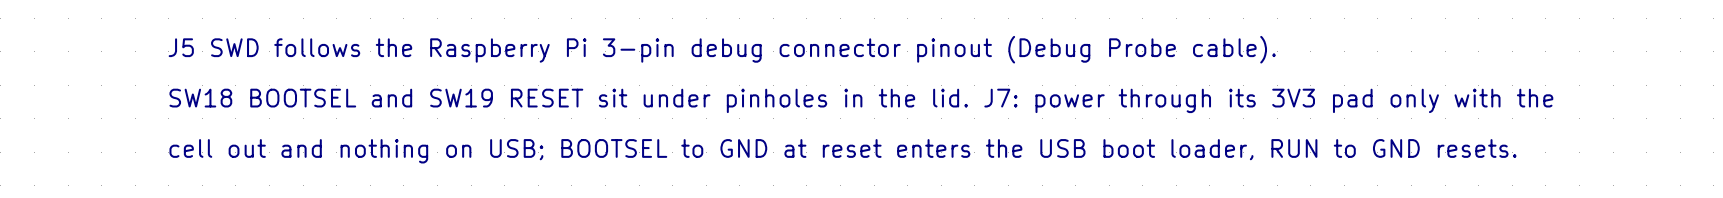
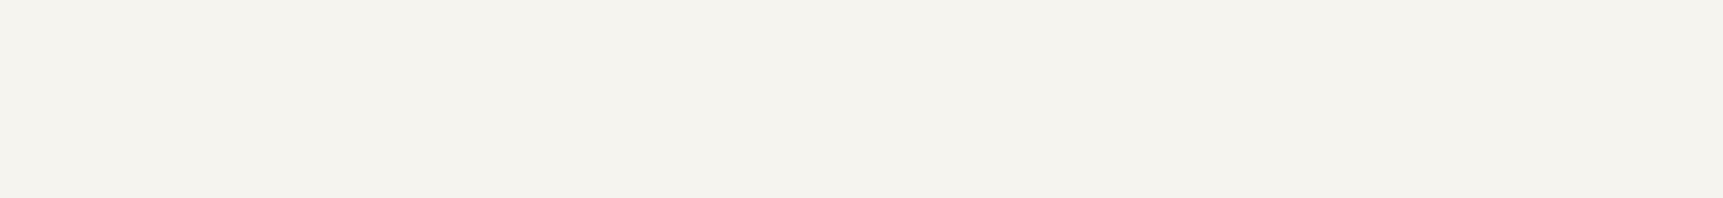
text: J5 SWD follows the Raspberry Pi 3-pin debug connector pinout (Debug Probe cable). (722, 49) -> none
text: SW18 BOOTSEL and SW19 RESET sit under pinholes in the lid. J7: power through its 3V3 pad only with the (861, 100) -> none
text: cell out and nothing on USB; BOOTSEL to GND at reset enters the USB boot loader, RUN to GND resets. (842, 151) -> none

